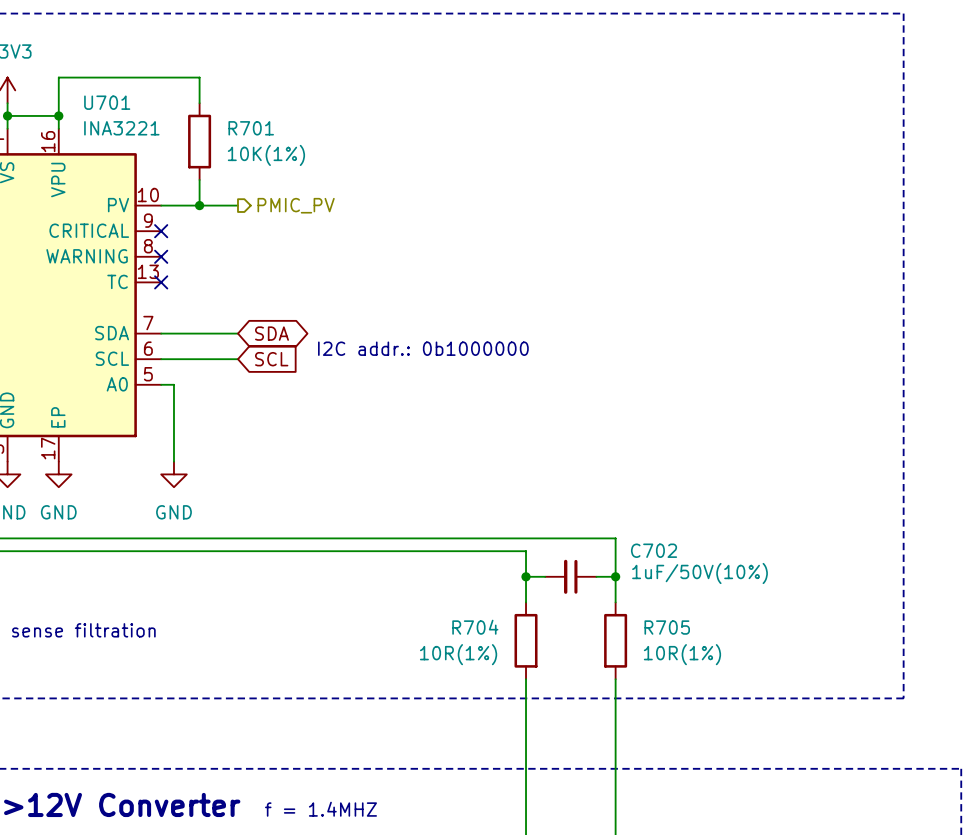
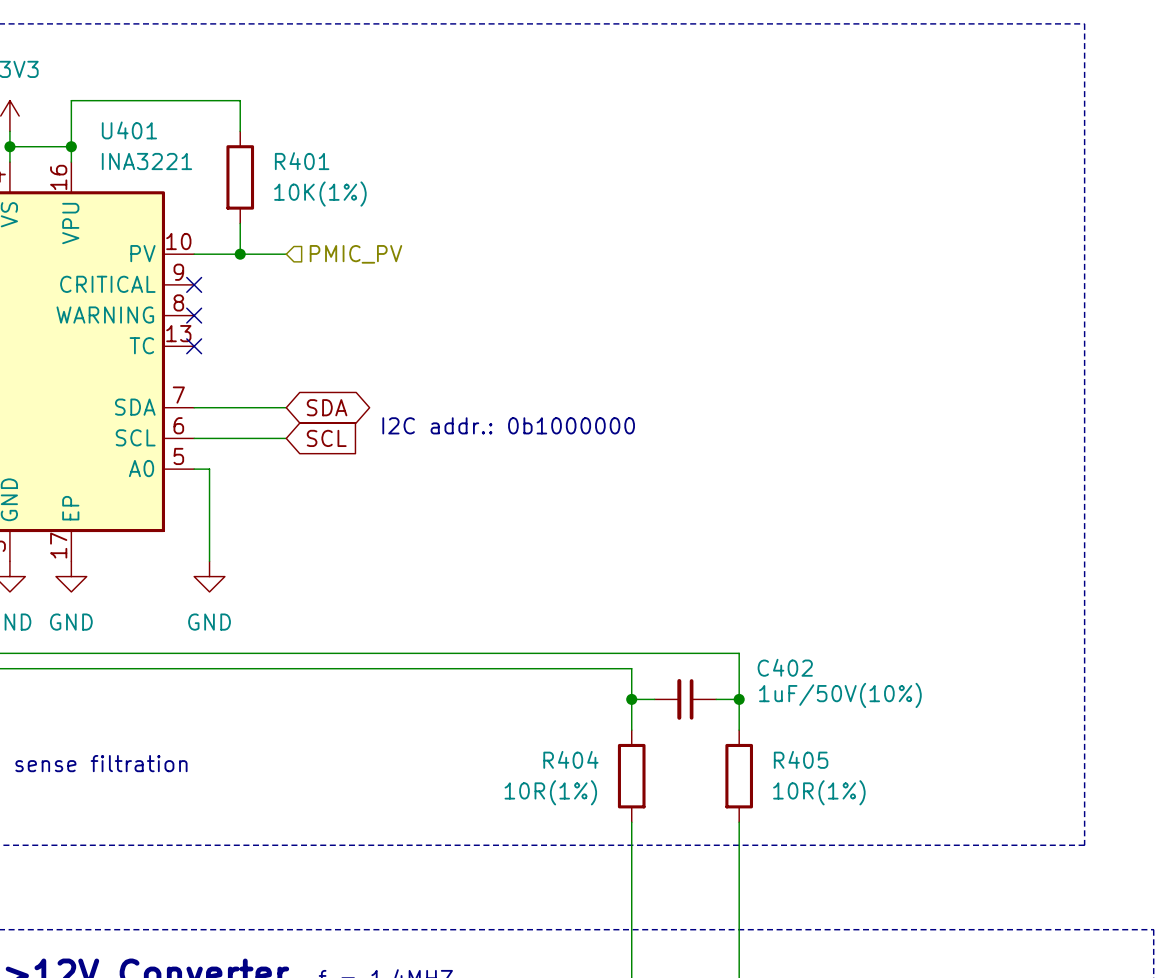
U701 name: U701 (107, 102) -> U401 (129, 130)
R701 name: R701 (251, 128) -> R401 (302, 161)
hierarchical label shape: output (296, 205) -> input (355, 254)
C702 name: C702 (654, 550) -> C402 (785, 667)
R704 name: R704 (475, 627) -> R404 (570, 759)
R705 name: R705 (667, 627) -> R405 (801, 759)

